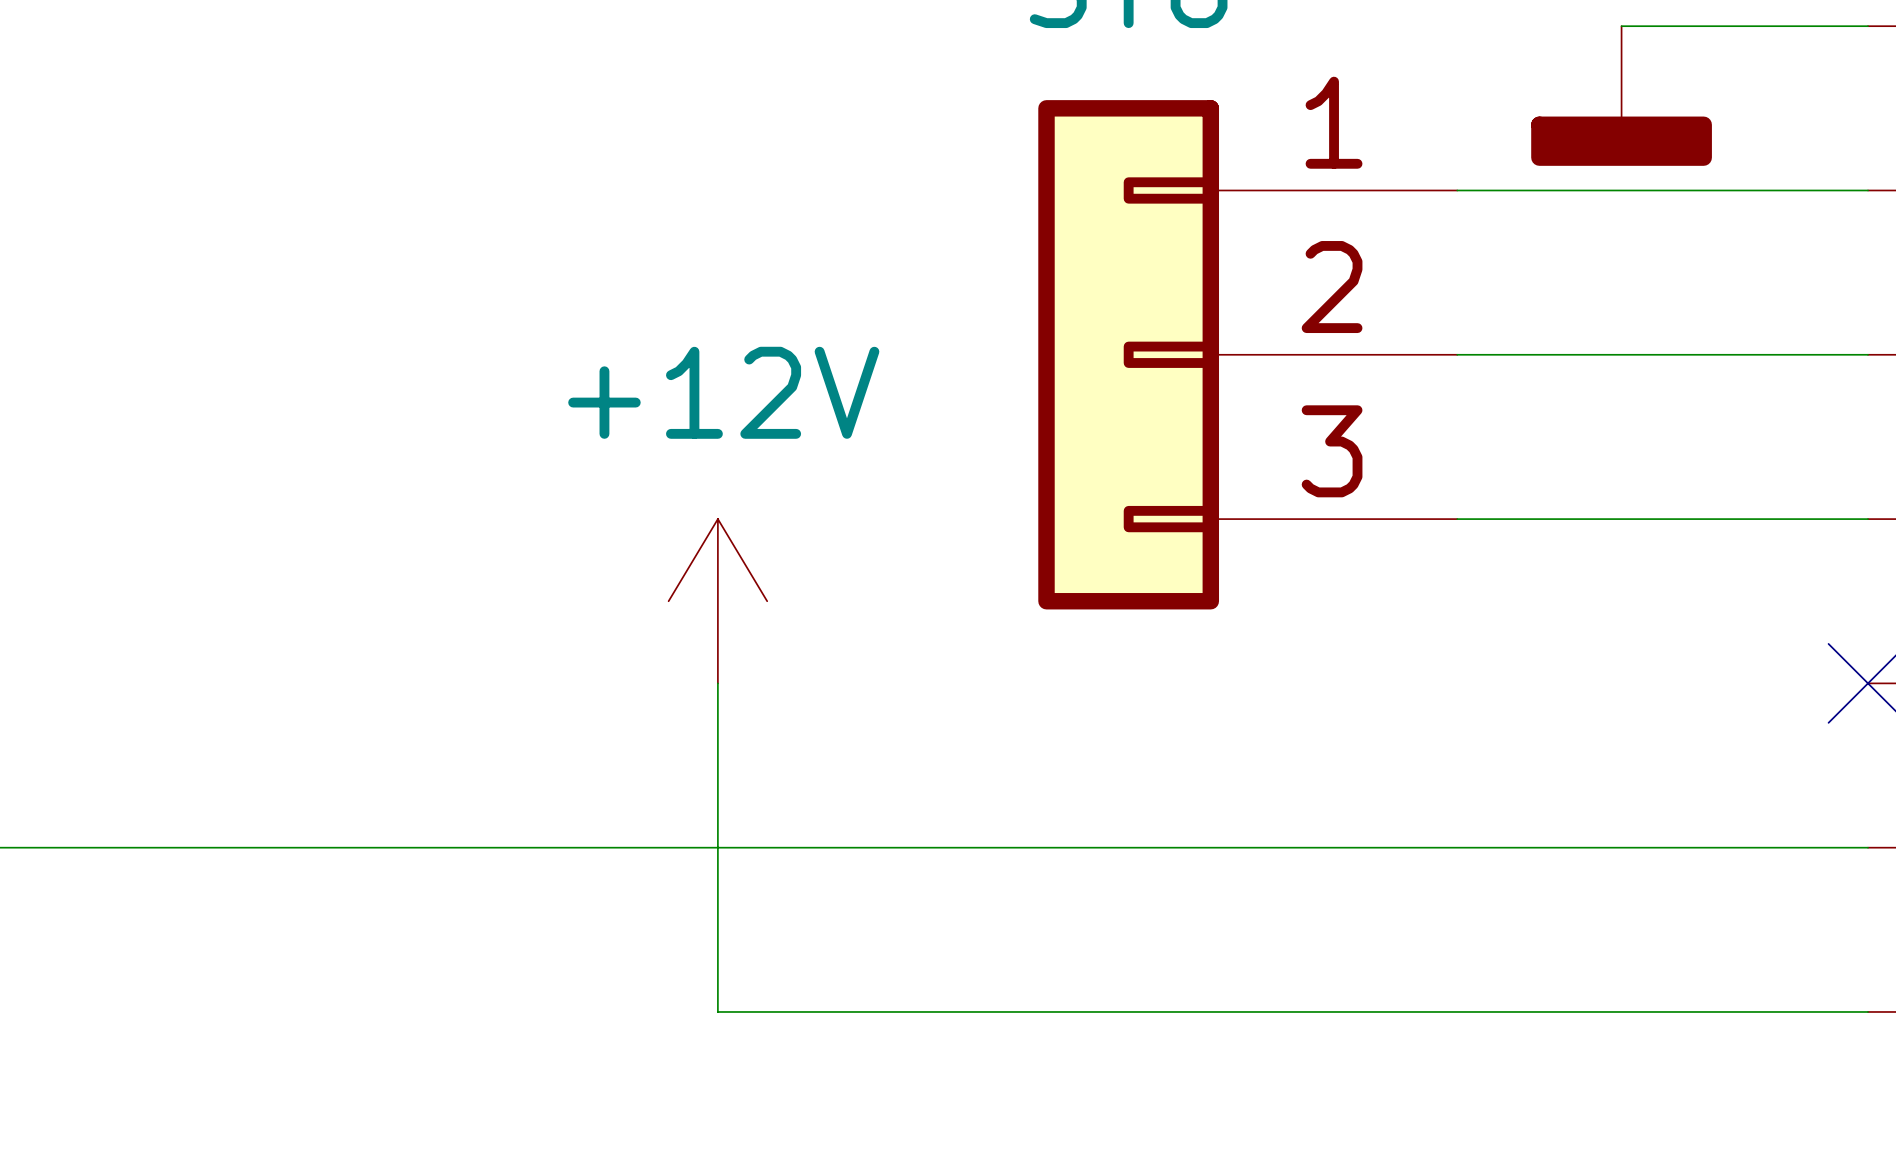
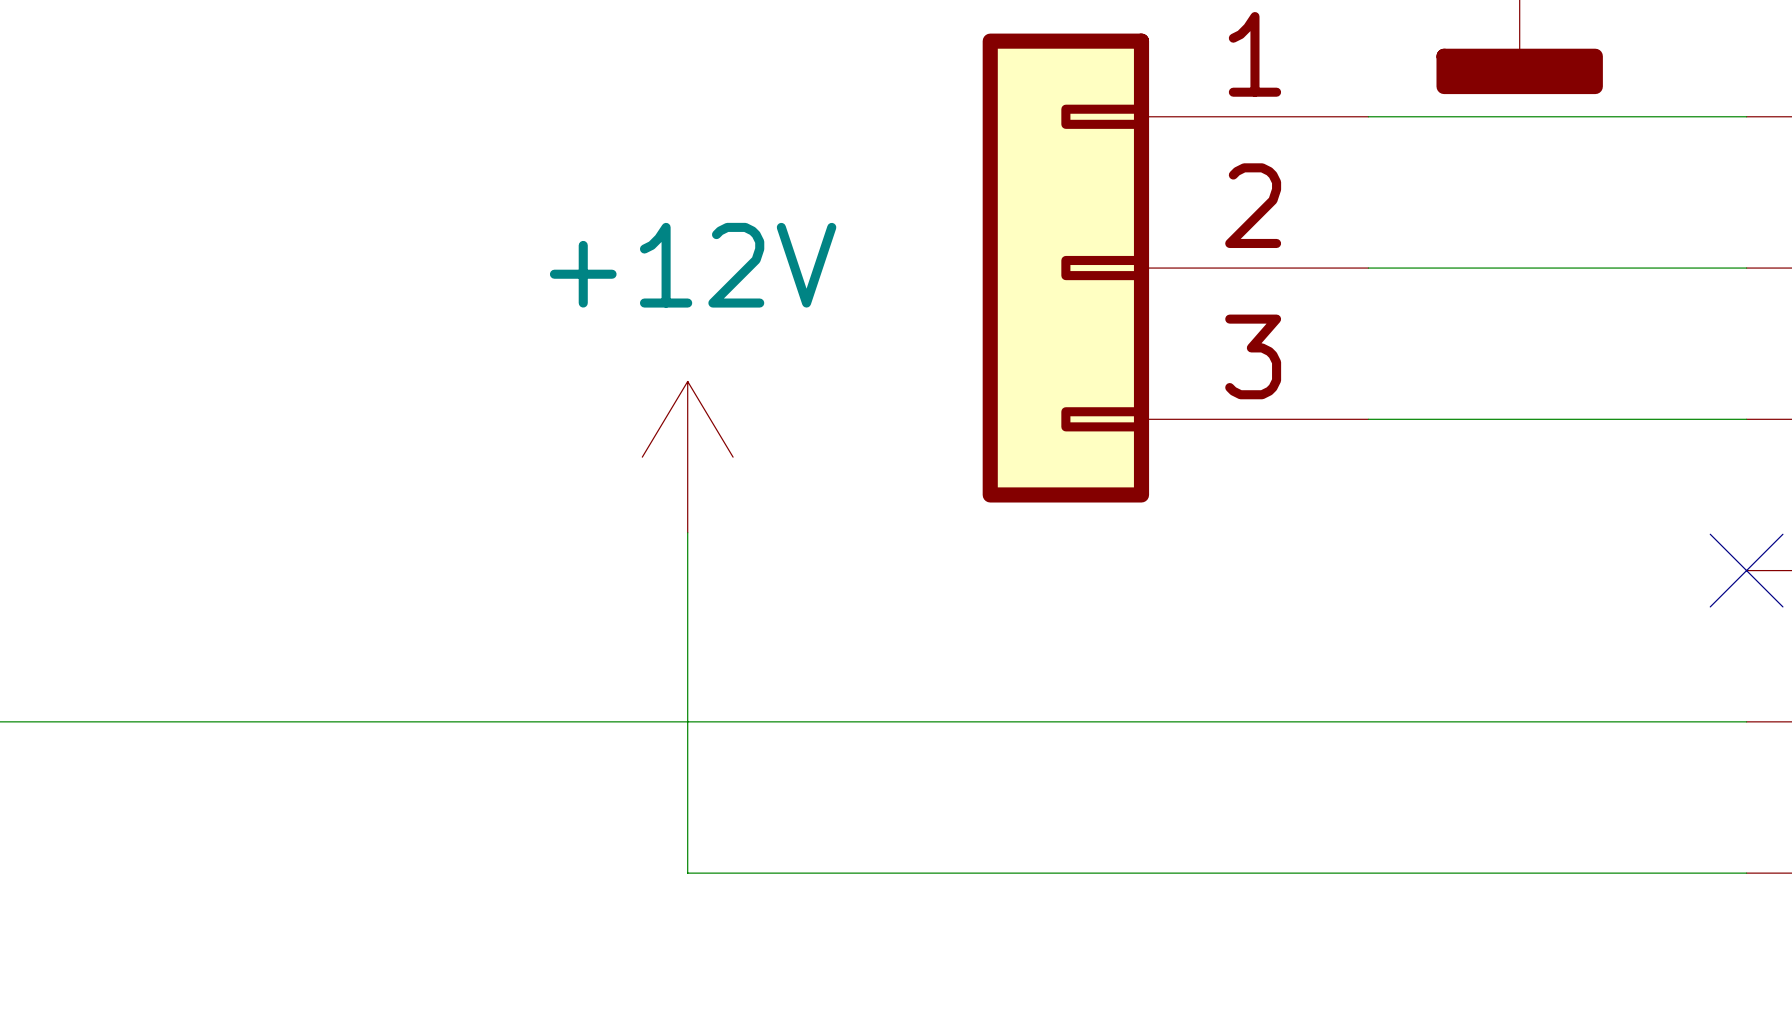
power symbol position: +12V (717, 601) -> +12V (687, 457)

